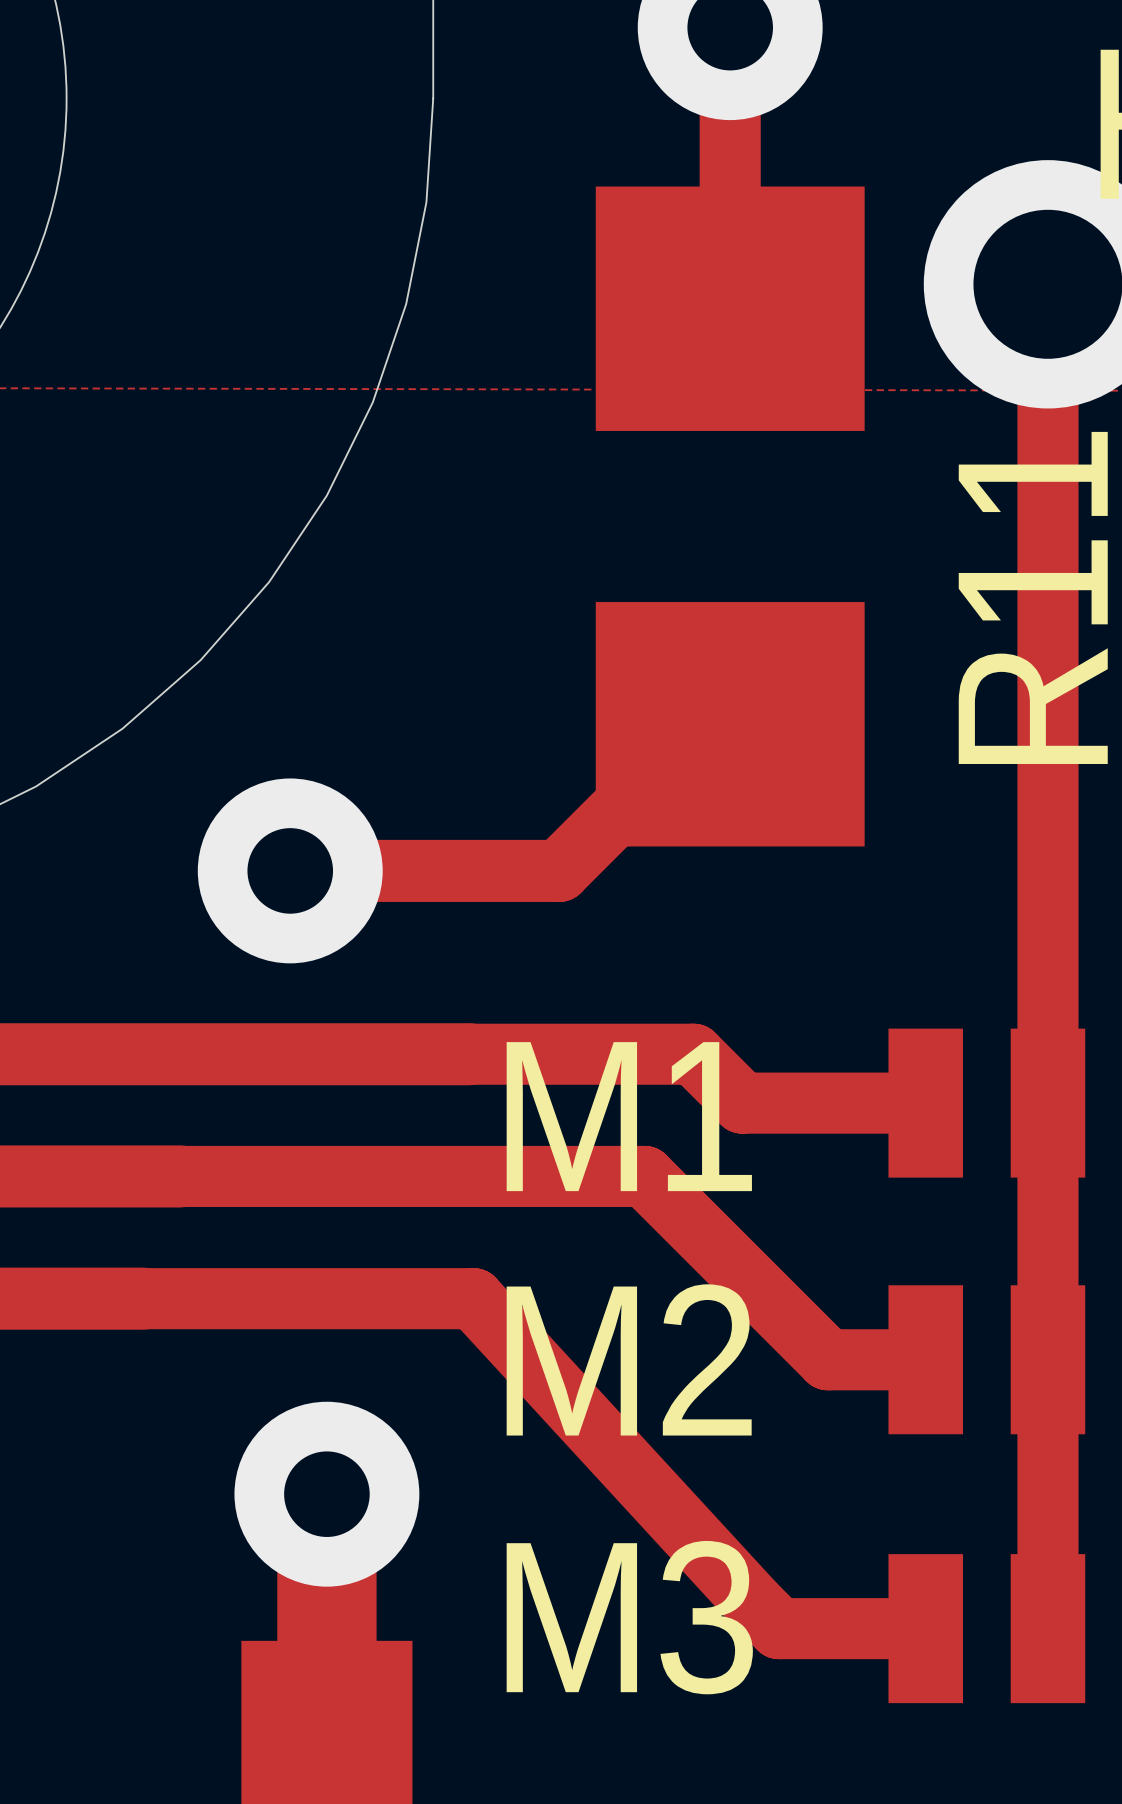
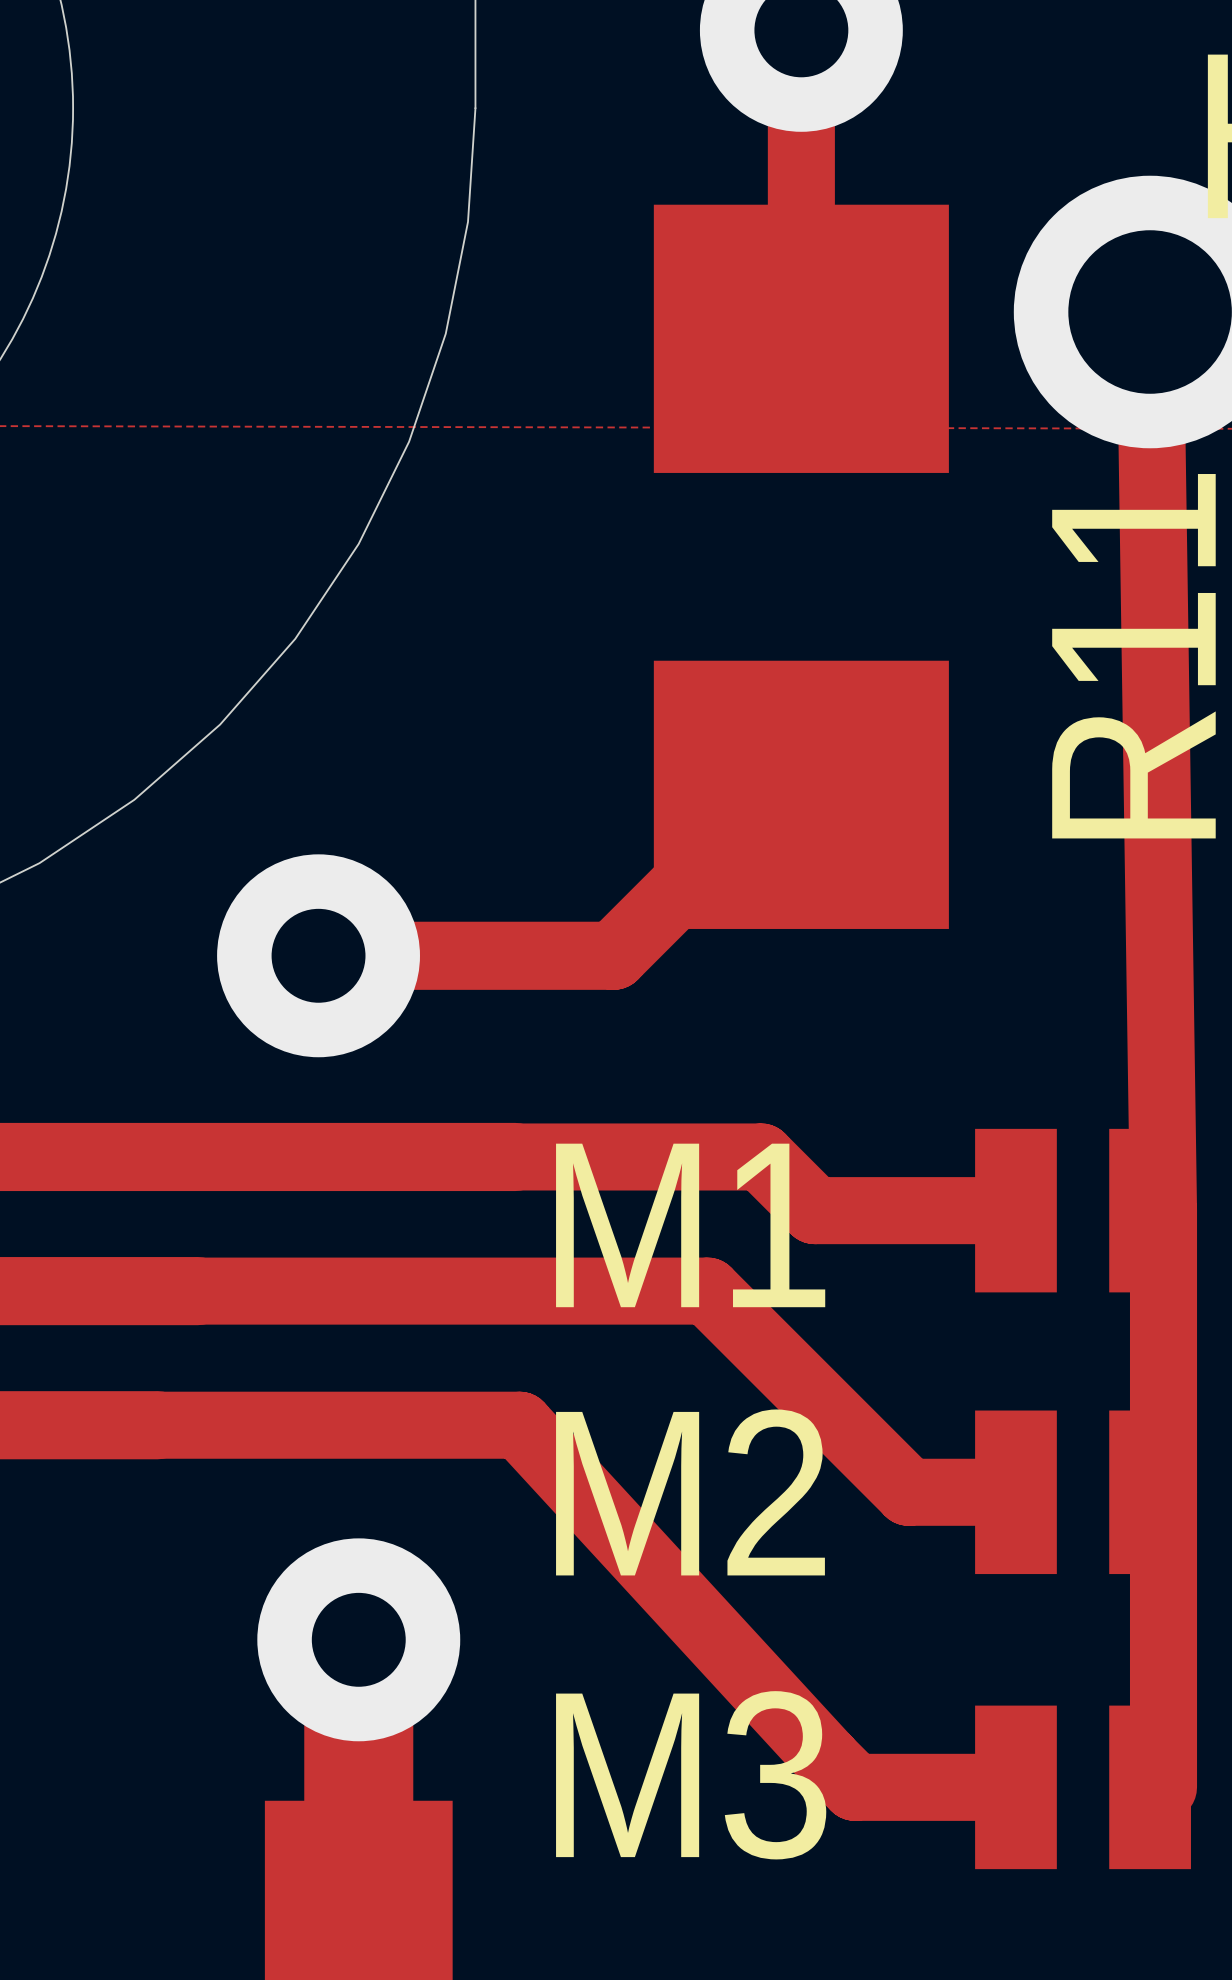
track: (1047, 284) (1047, 1628) -> (1150, 312) (1163, 1210) (1163, 1787)

